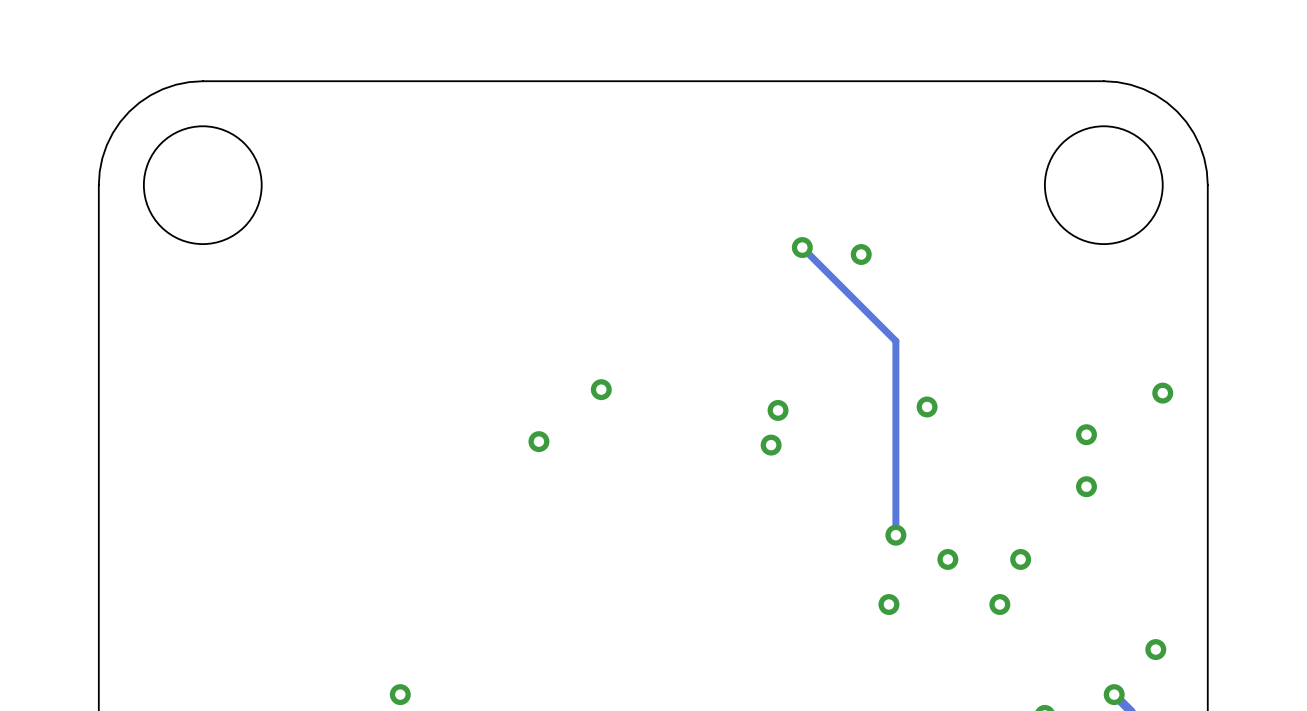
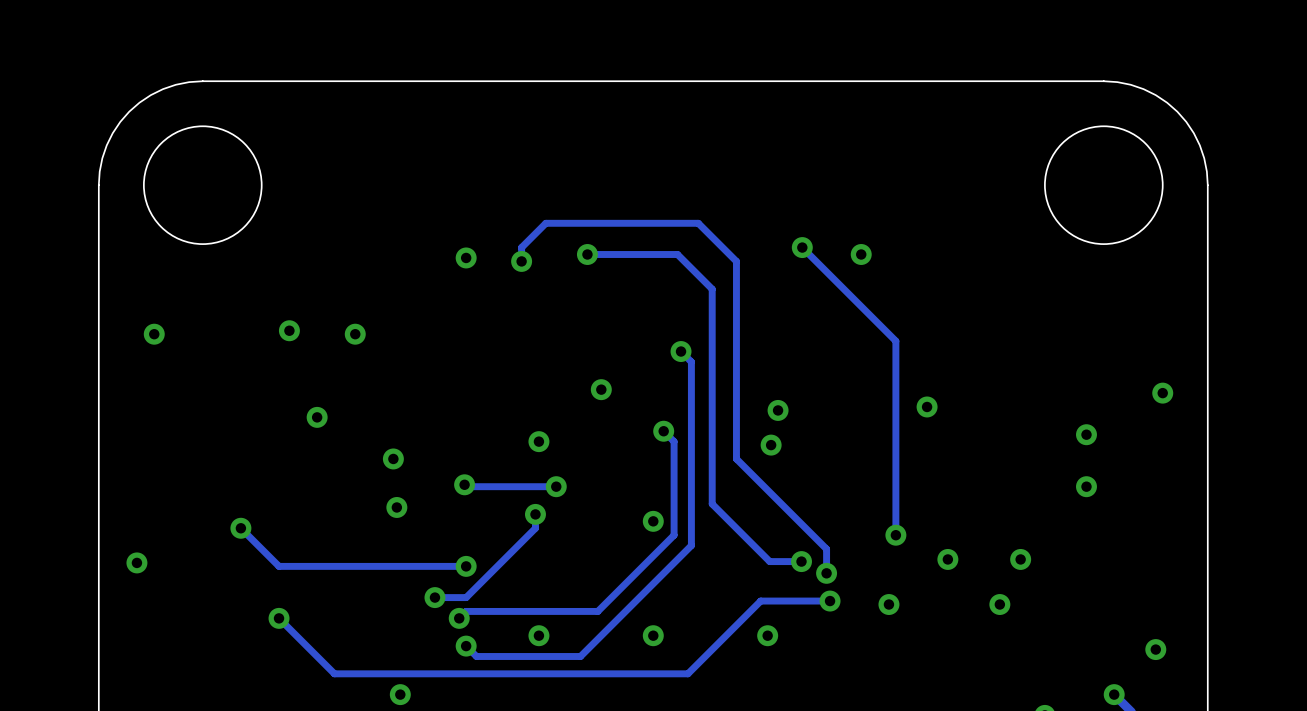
track: none -> (587, 254) (677, 254) (712, 289) (712, 504) (769, 561) (801, 561)
via: none -> (587, 254)
via: none -> (466, 257)
track: none -> (521, 261) (521, 247) (545, 223) (698, 223) (736, 261) (736, 458) (826, 549) (826, 573)
via: none -> (521, 261)
via: none -> (289, 330)
via: none -> (154, 334)
via: none -> (355, 334)
track: none -> (681, 351) (691, 361) (691, 545) (580, 656) (476, 656) (466, 646)
via: none -> (681, 351)
via: none -> (317, 417)
track: none -> (663, 431) (674, 441) (674, 535) (597, 611) (466, 611) (459, 618)
via: none -> (663, 431)
via: none -> (393, 458)
track: none -> (464, 484) (466, 486) (556, 486)
via: none -> (464, 484)
via: none -> (556, 486)
via: none -> (396, 507)
track: none -> (535, 514) (535, 528) (466, 597) (434, 597)
via: none -> (535, 514)
via: none -> (653, 521)
track: none -> (240, 528) (279, 566) (466, 566)
via: none -> (240, 528)
via: none -> (801, 561)
via: none -> (136, 562)
via: none -> (466, 566)
via: none -> (826, 573)
via: none -> (434, 597)
track: none -> (830, 601) (760, 601) (687, 673) (334, 673) (279, 618)
via: none -> (830, 601)
via: none -> (279, 618)
via: none -> (459, 618)
via: none -> (538, 635)
via: none -> (653, 635)
via: none -> (767, 635)
via: none -> (466, 646)

